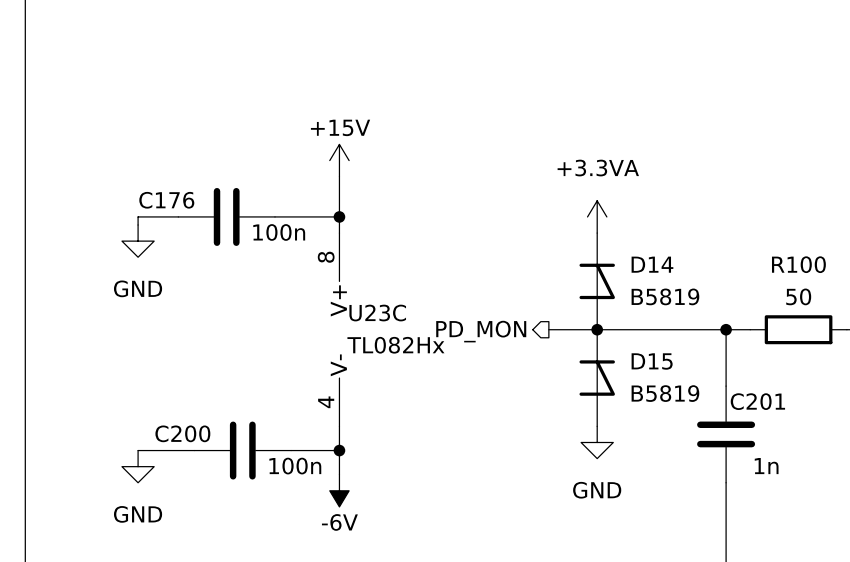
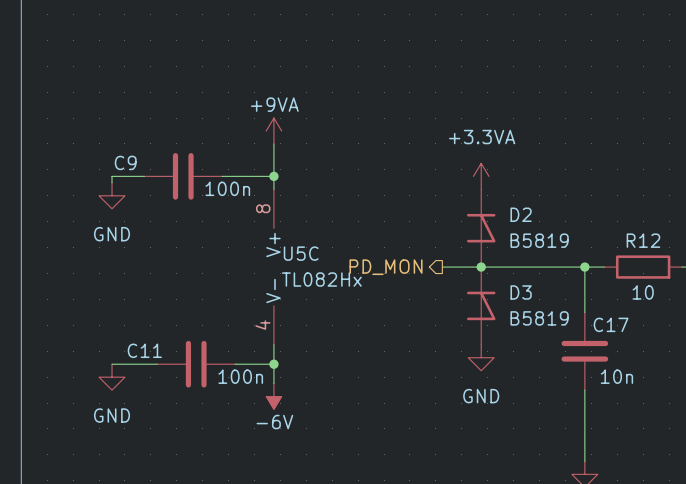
power symbol: +15V (339, 160) -> +9VA (273, 131)
C176 name: C176 (166, 200) -> C9 (125, 162)
D14 name: D14 (652, 264) -> D2 (521, 214)
R100 name: R100 (798, 264) -> R12 (643, 240)
R100 value: 50 (798, 296) -> 10 (643, 292)
U23C name: U23C (377, 313) -> U5C (301, 253)
D15 name: D15 (652, 361) -> D3 (521, 292)
C201 name: C201 (757, 401) -> C17 (611, 324)
C200 name: C200 (182, 433) -> C11 (144, 350)
C201 value: 1n (766, 466) -> 10n (616, 376)

